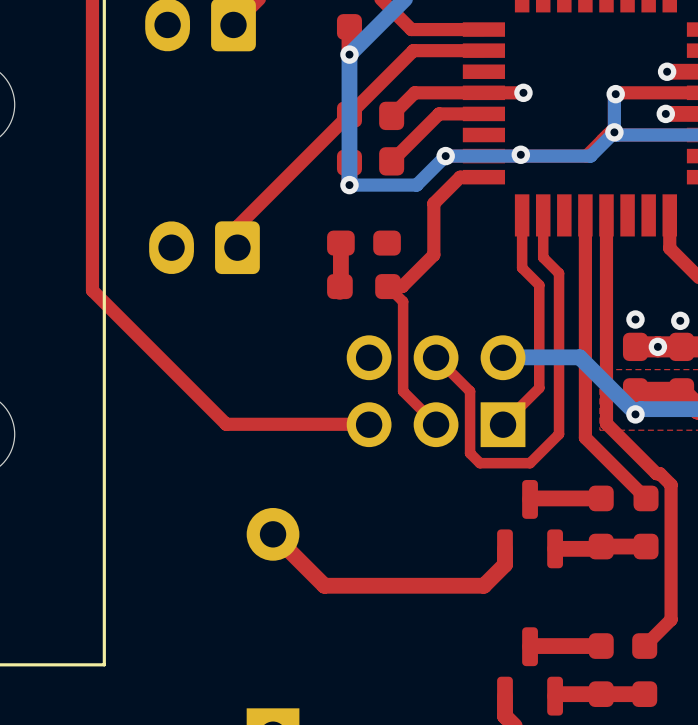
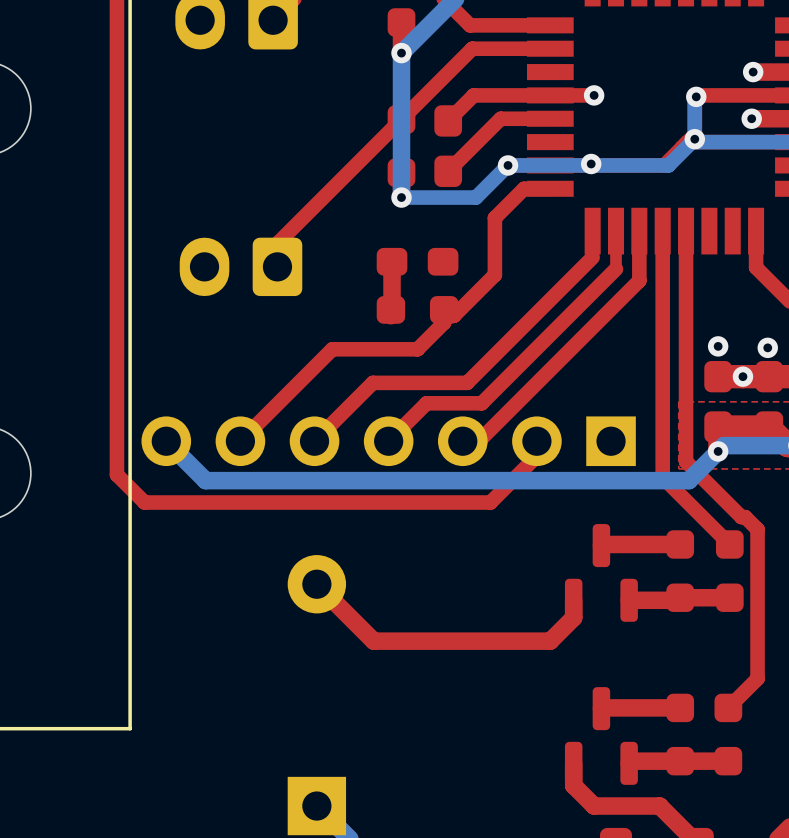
top track: none -> (639, 231) (639, 280) (478, 441) (462, 441)
top track: (522, 239) (522, 268) (539, 285) (539, 388) (503, 424) -> (592, 257) (467, 382) (372, 382) (314, 441)
top track: (543, 249) (543, 257) (559, 273) (559, 434) (530, 463) (479, 463) (470, 453) (470, 391) (436, 357) -> (616, 269) (481, 403) (426, 403) (388, 441)
top track: (402, 286) (388, 286) (403, 301) (403, 391) (436, 424) -> (459, 309) (454, 315) (444, 315) (444, 322) (417, 349) (332, 349) (240, 441)
top track: (92, 290) (226, 424) (369, 424) -> (116, 314) (116, 474) (144, 502) (490, 502) (536, 456) (536, 441)
bottom track: (503, 357) (579, 357) (635, 414) -> (166, 441) (205, 480) (688, 480) (718, 451)
part: (436, 391) -> none
part: none -> (388, 441)

